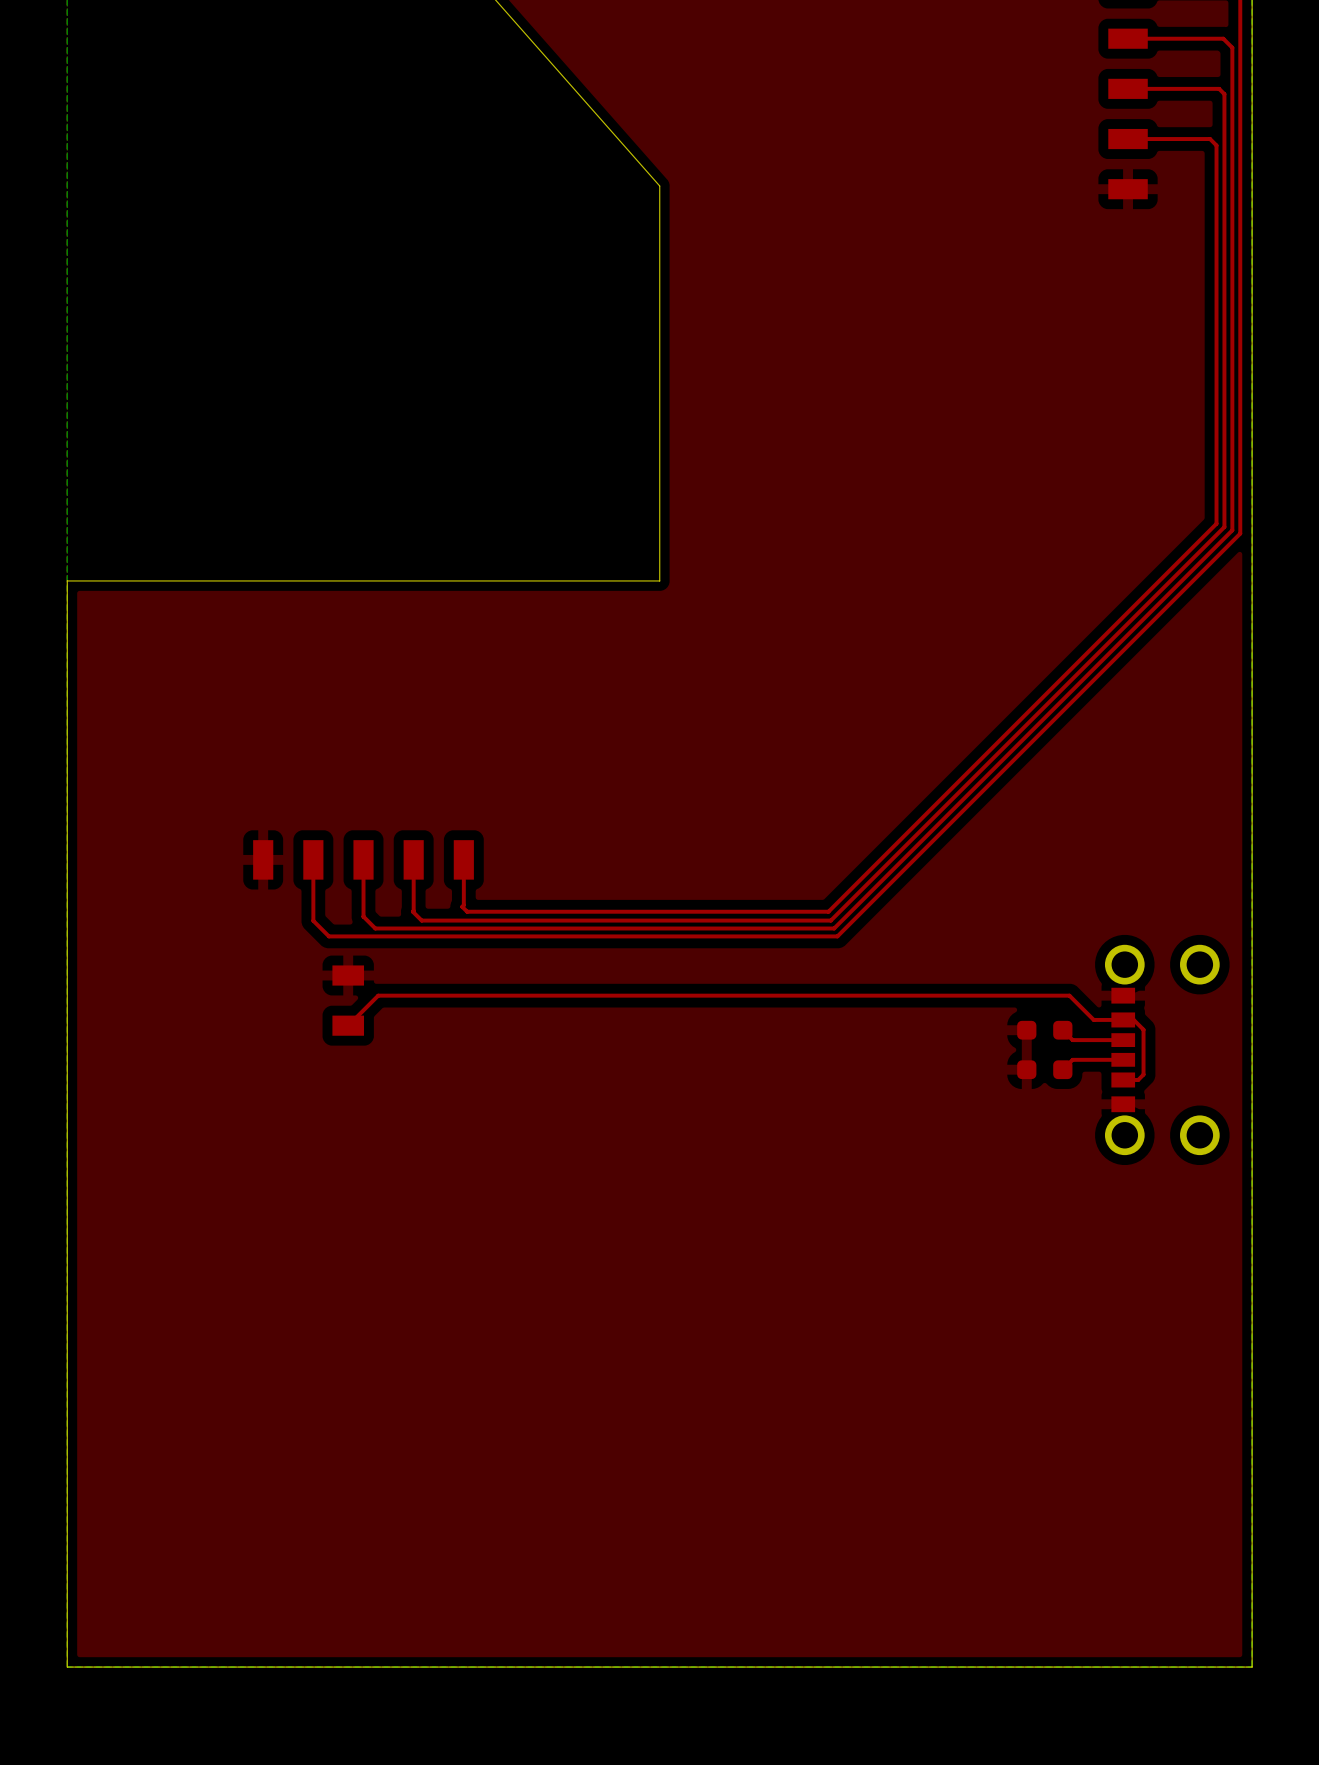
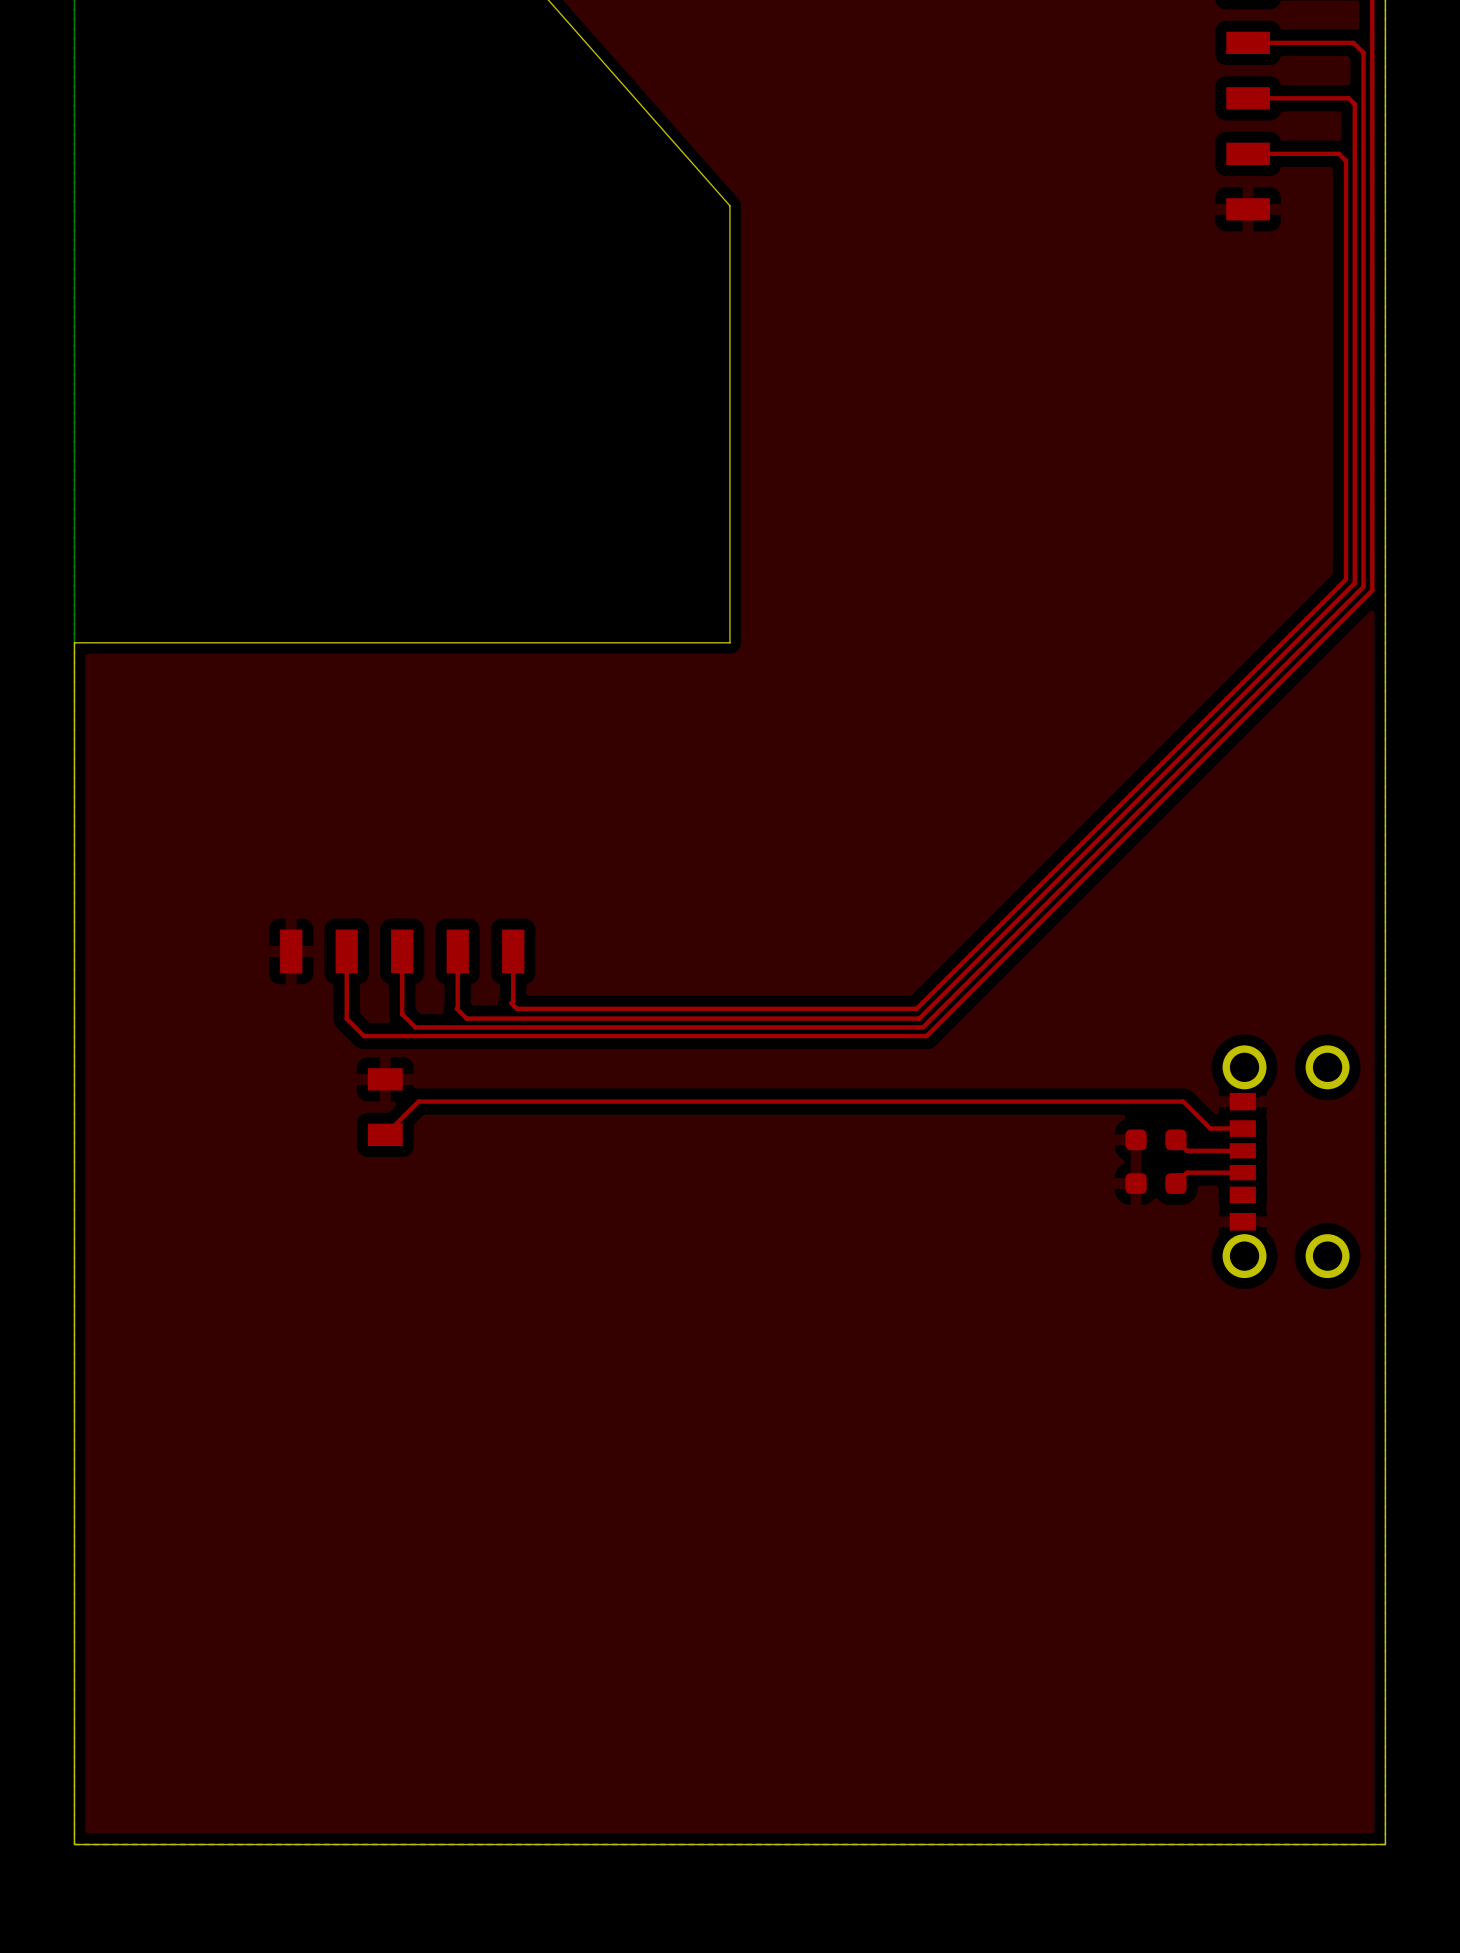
top track: (1123, 1019) (1133, 1019) (1143, 1029) (1143, 1074) (1138, 1079) (1123, 1079) -> none

